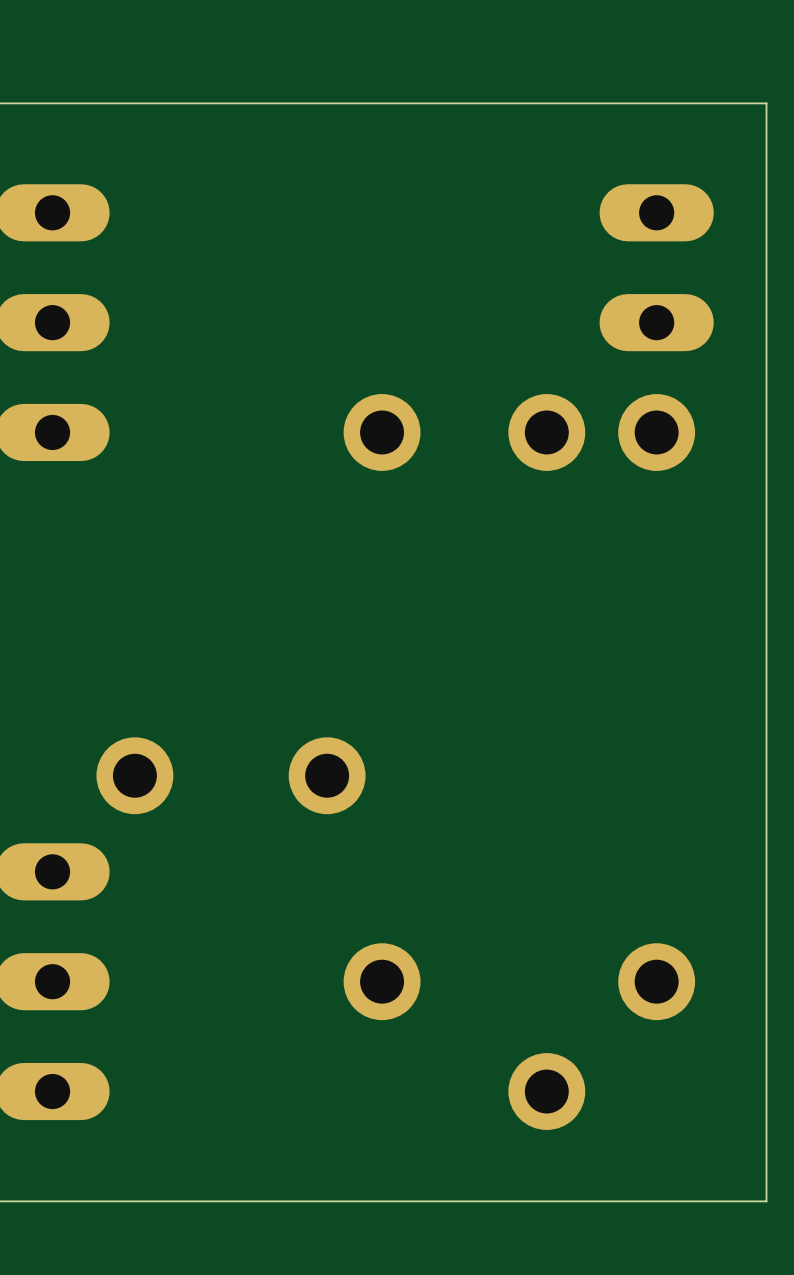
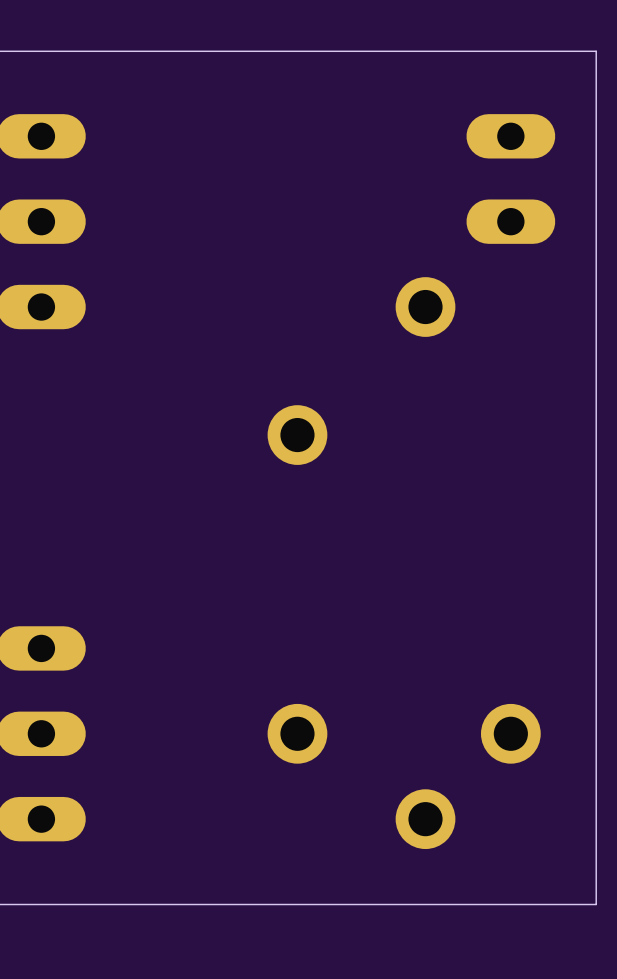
part: (382, 432) -> none
part: (656, 432) -> none
part: none -> (297, 435)
part: (134, 775) -> none
part: (327, 775) -> none

